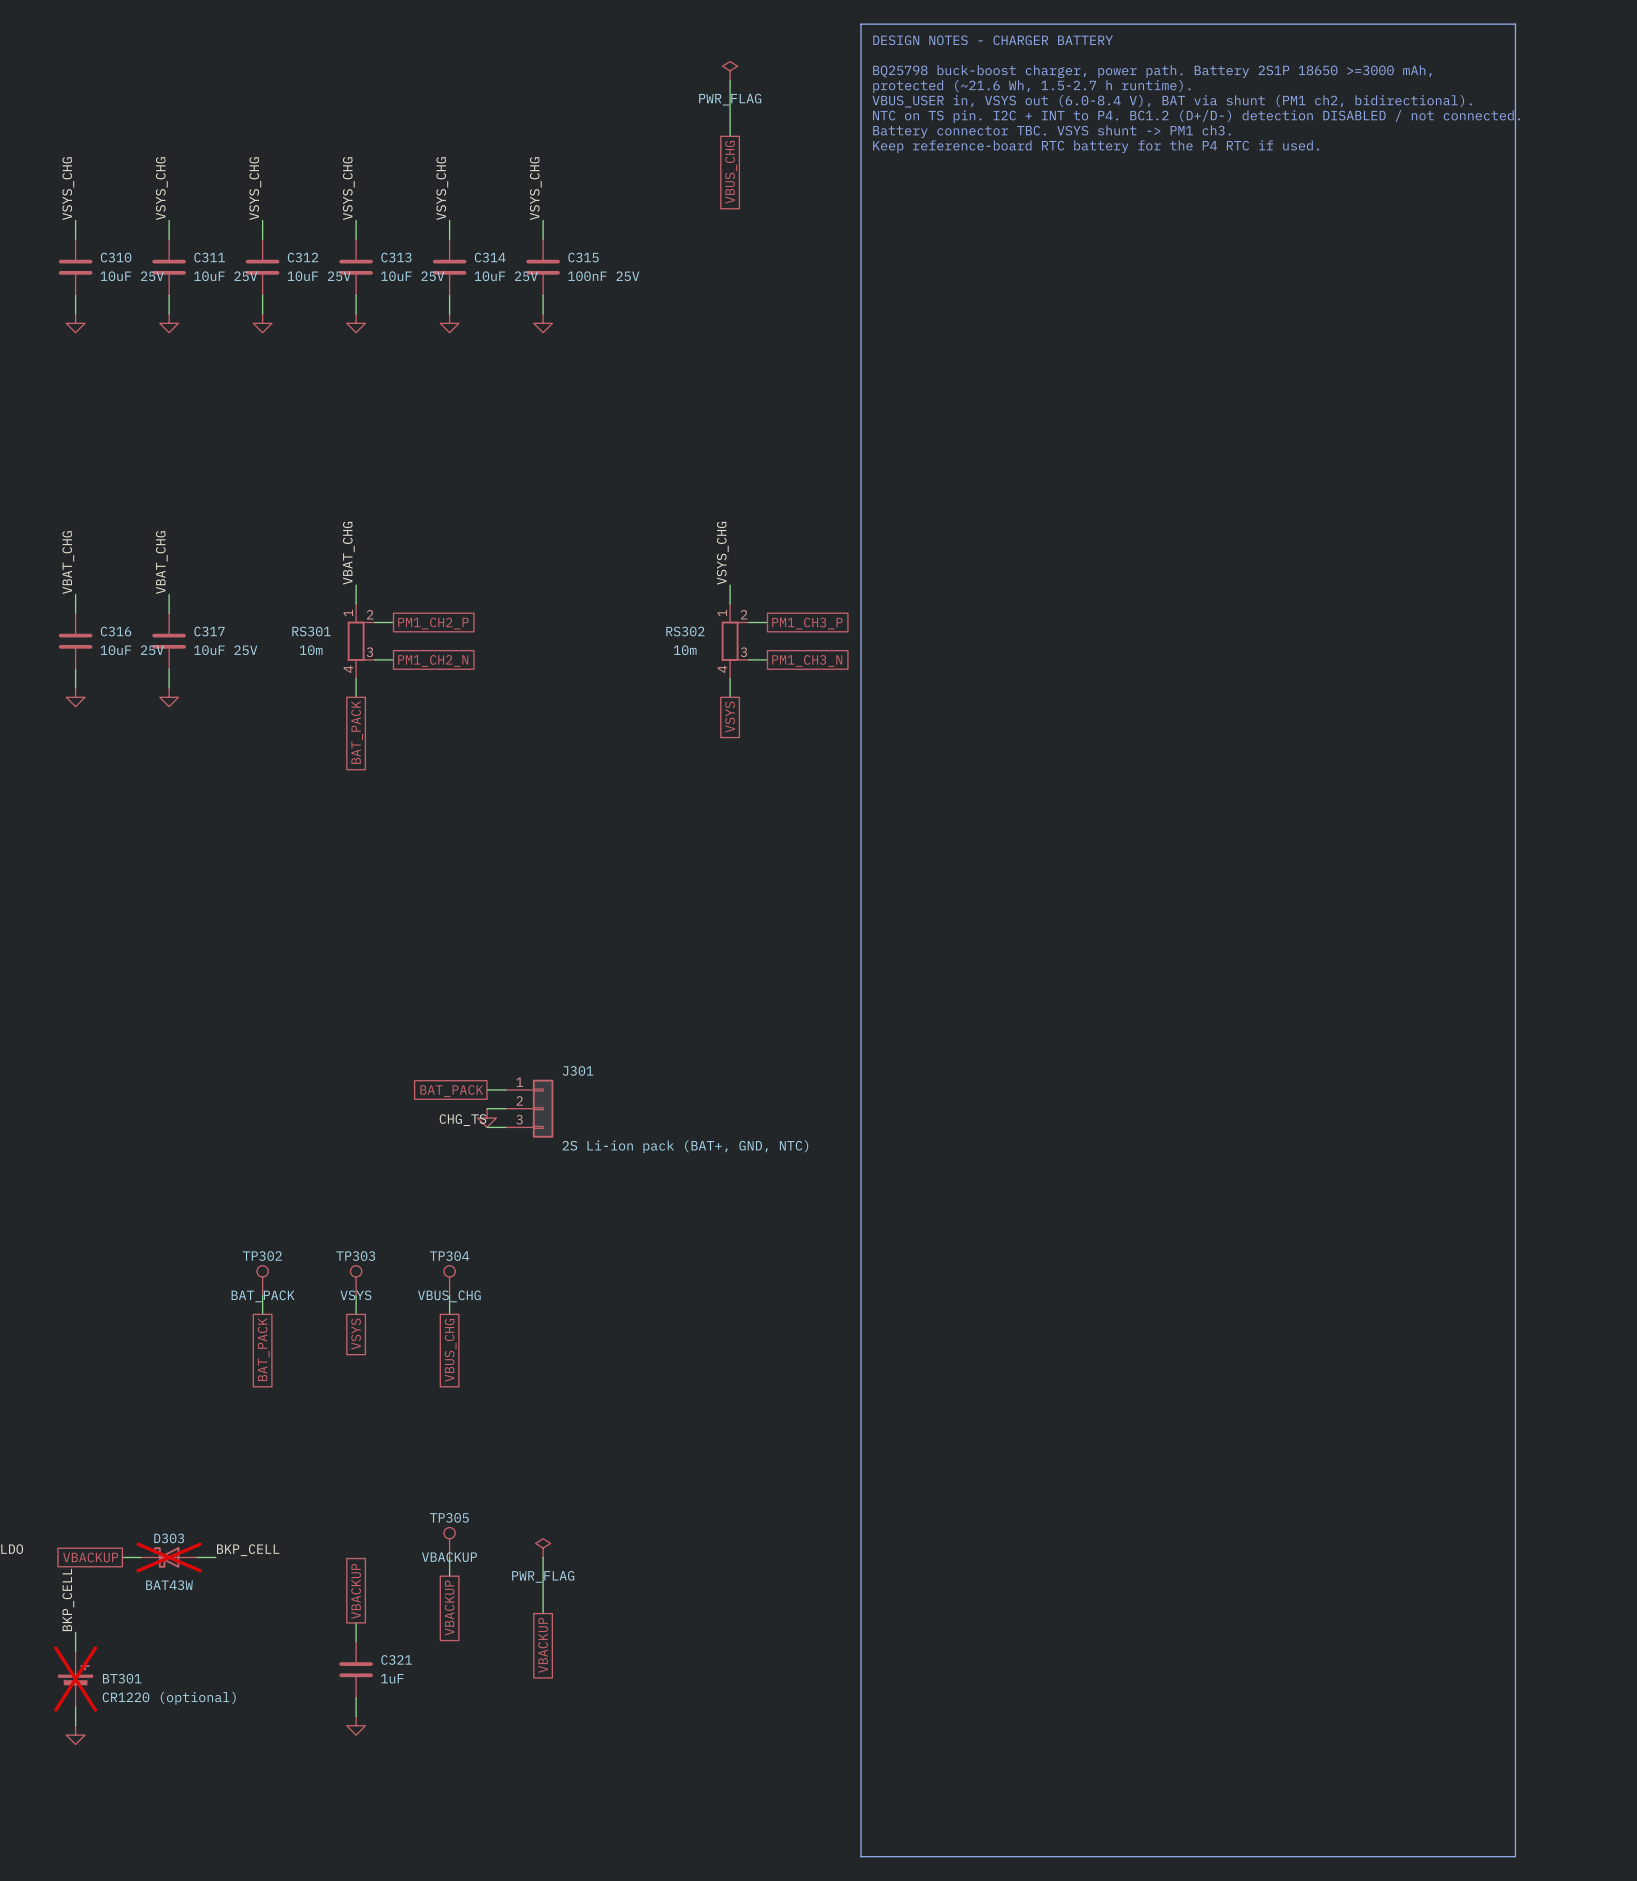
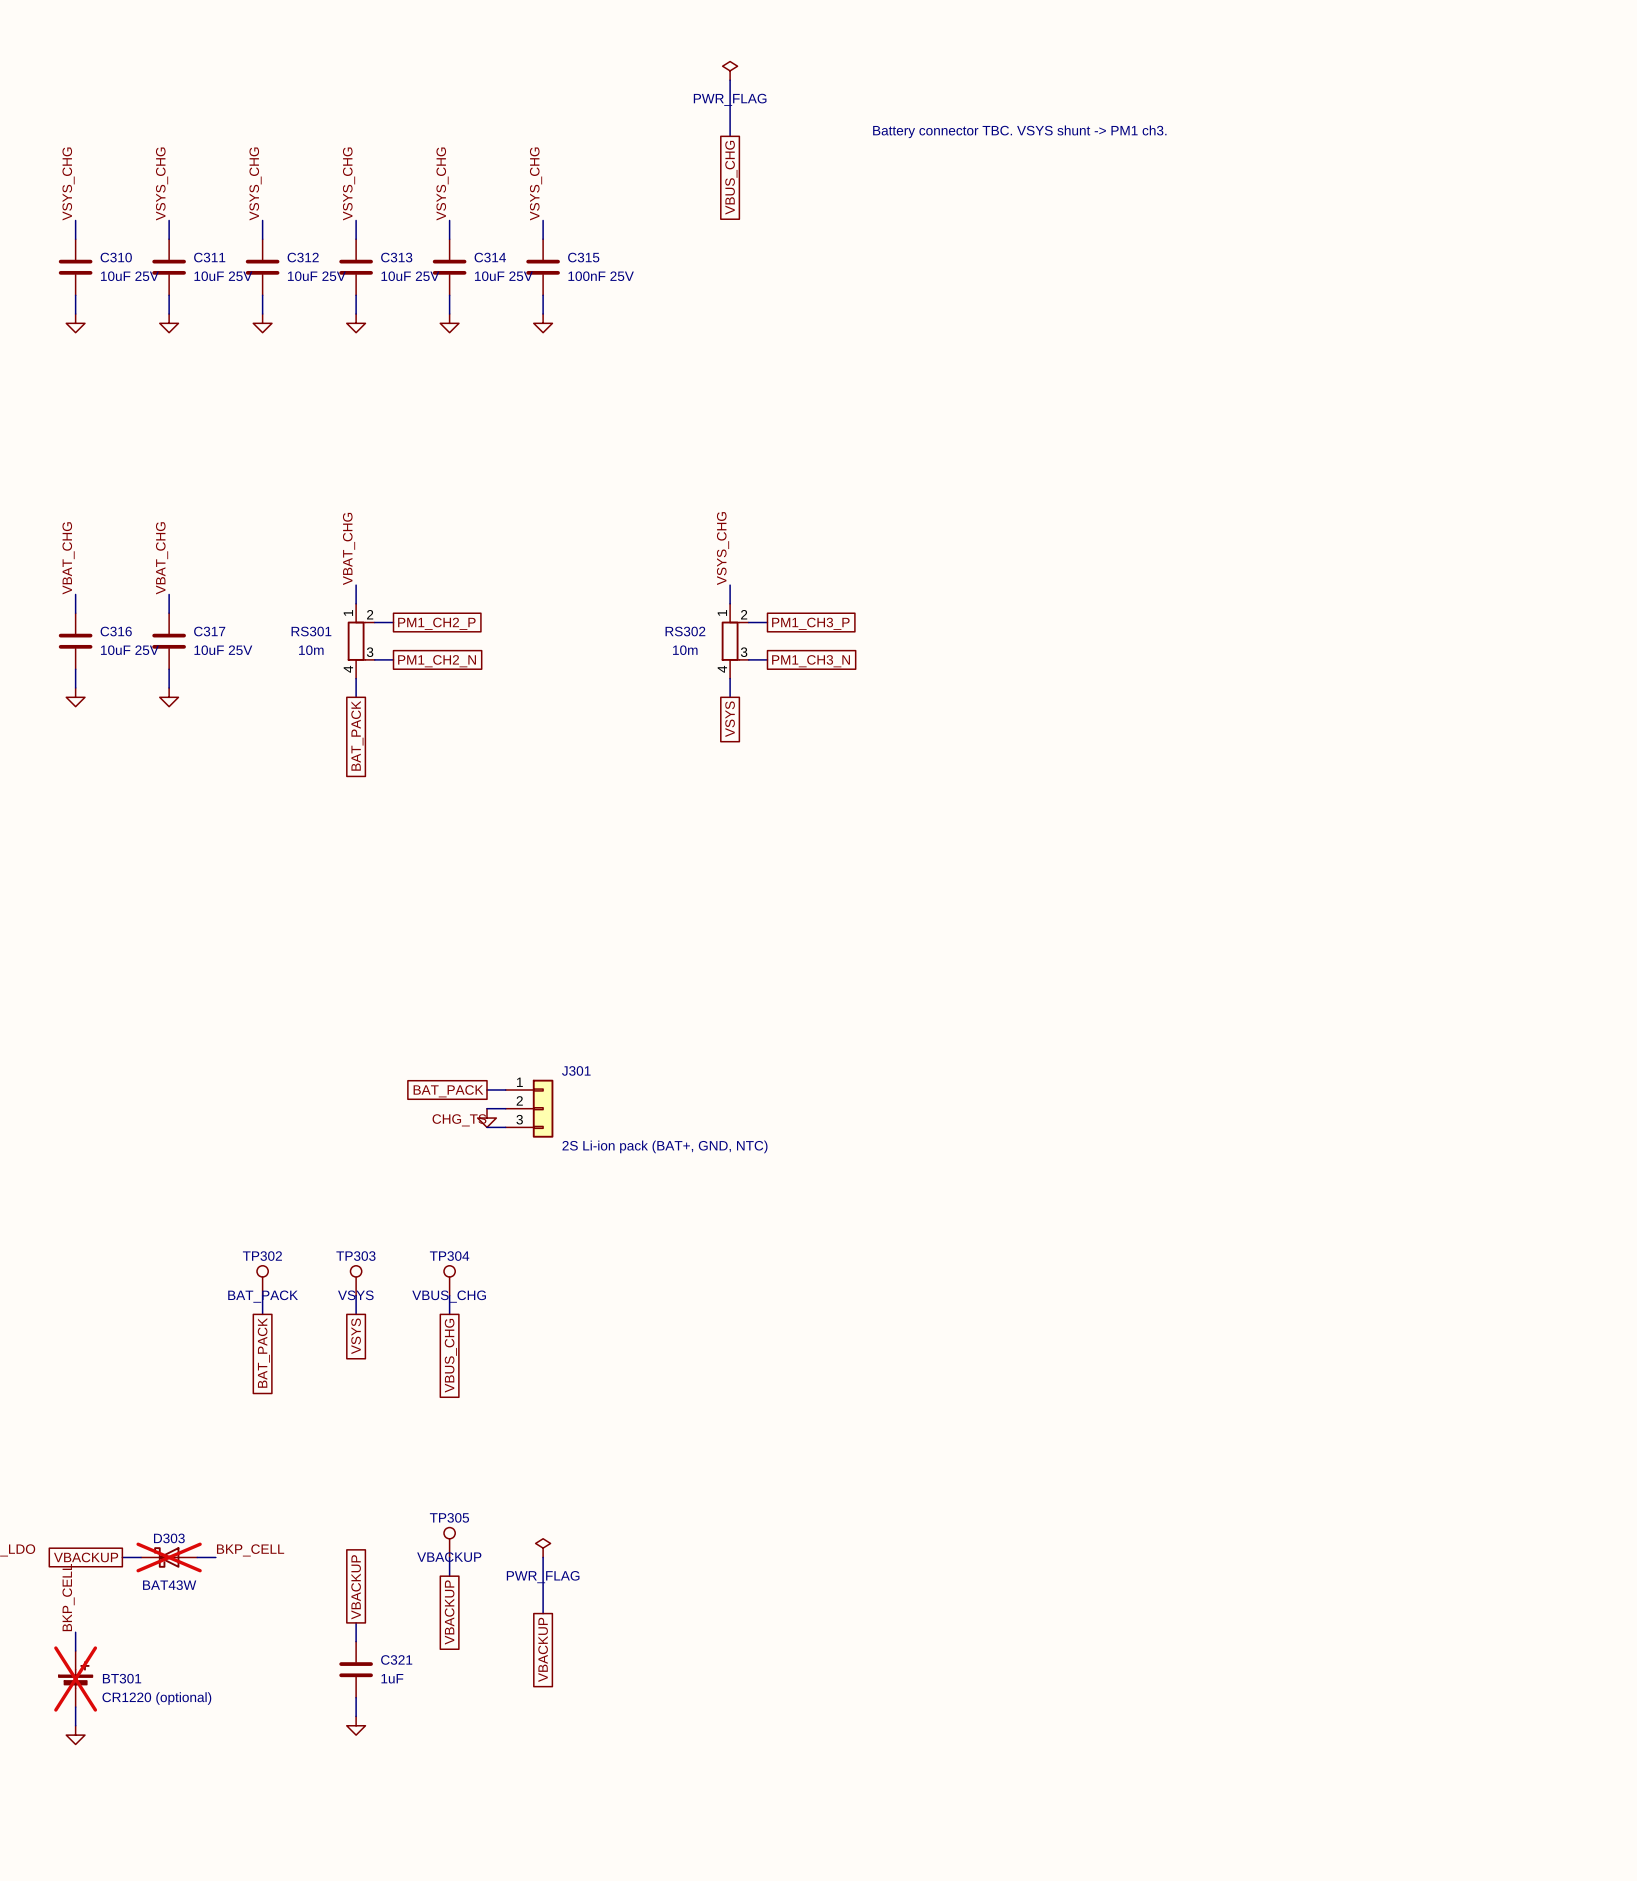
line: (860, 24) (1515, 24) (1515, 1856) (860, 1856) (860, 24) -> none
text: DESIGN NOTES - CHARGER BATTERY (993, 40) -> none
text: BQ25798 buck-boost charger, power path. Battery 2S1P 18650 >=3000 mAh, (1152, 71) -> none
text: protected (~21.6 Wh, 1.5-2.7 h runtime). (1031, 86) -> none
text: VBUS_USER in, VSYS out (6.0-8.4 V), BAT via shunt (PM1 ch2, bidirectional). (1172, 101) -> none
text: NTC on TS pin. I2C + INT to P4. BC1.2 (D+/D-) detection DISABLED / not connected. (1196, 116) -> none
text: Keep reference-board RTC battery for the P4 RTC if used. (1096, 146) -> none

